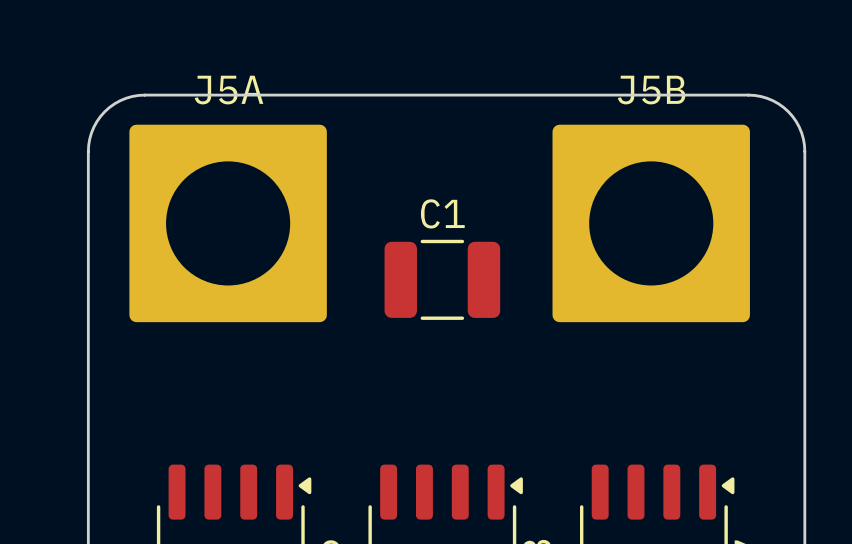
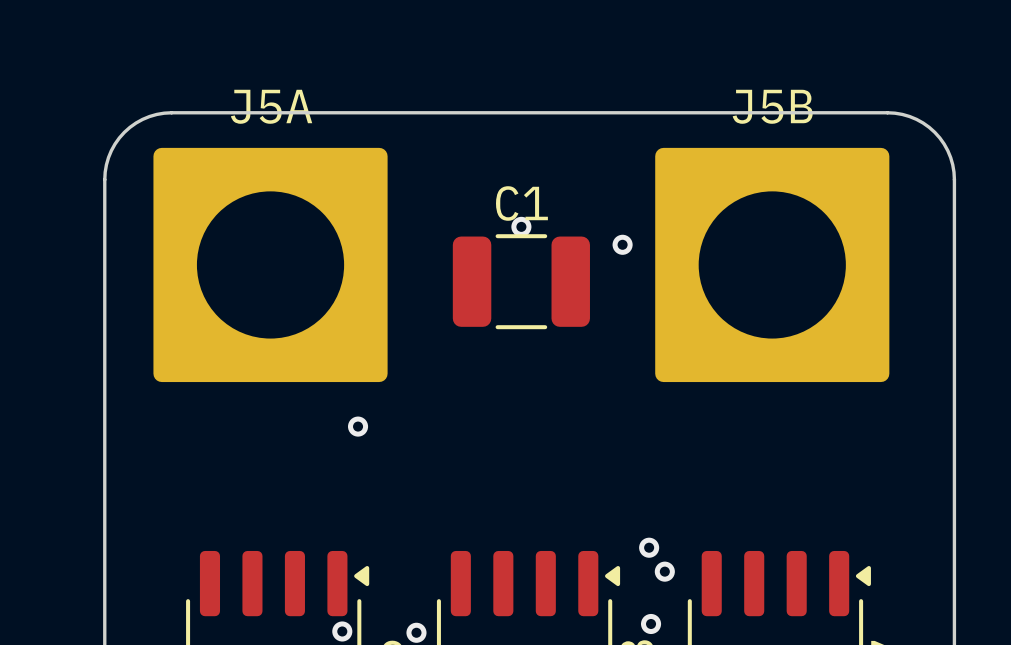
via: none -> (521, 226)
via: none -> (622, 244)
C1 position: (442, 279) -> (521, 281)
via: none -> (358, 426)
via: none -> (649, 547)
via: none -> (664, 571)
via: none -> (651, 623)
via: none -> (342, 631)
via: none -> (416, 632)

